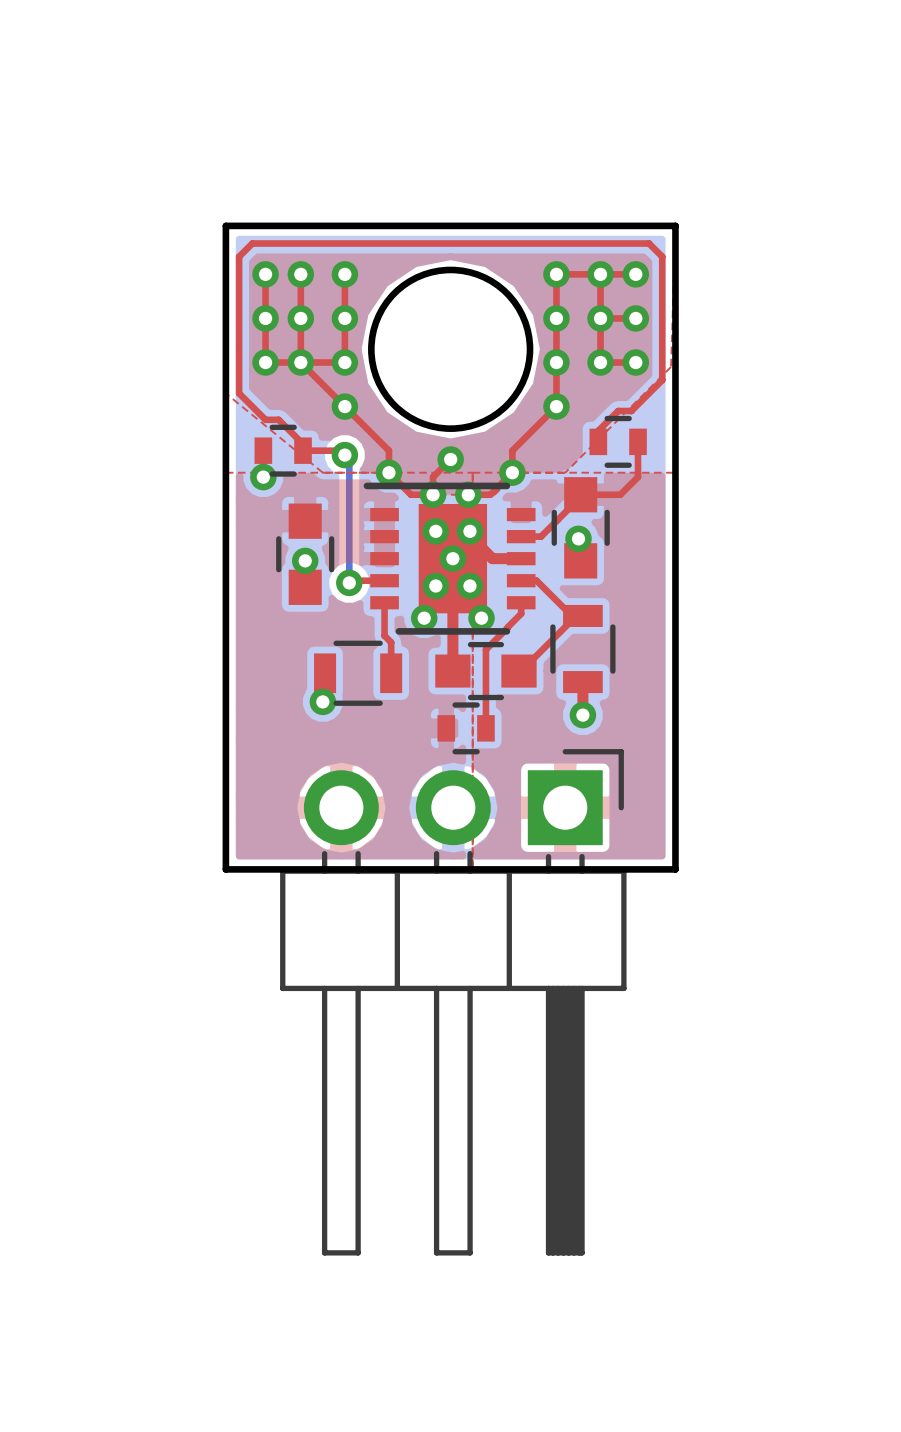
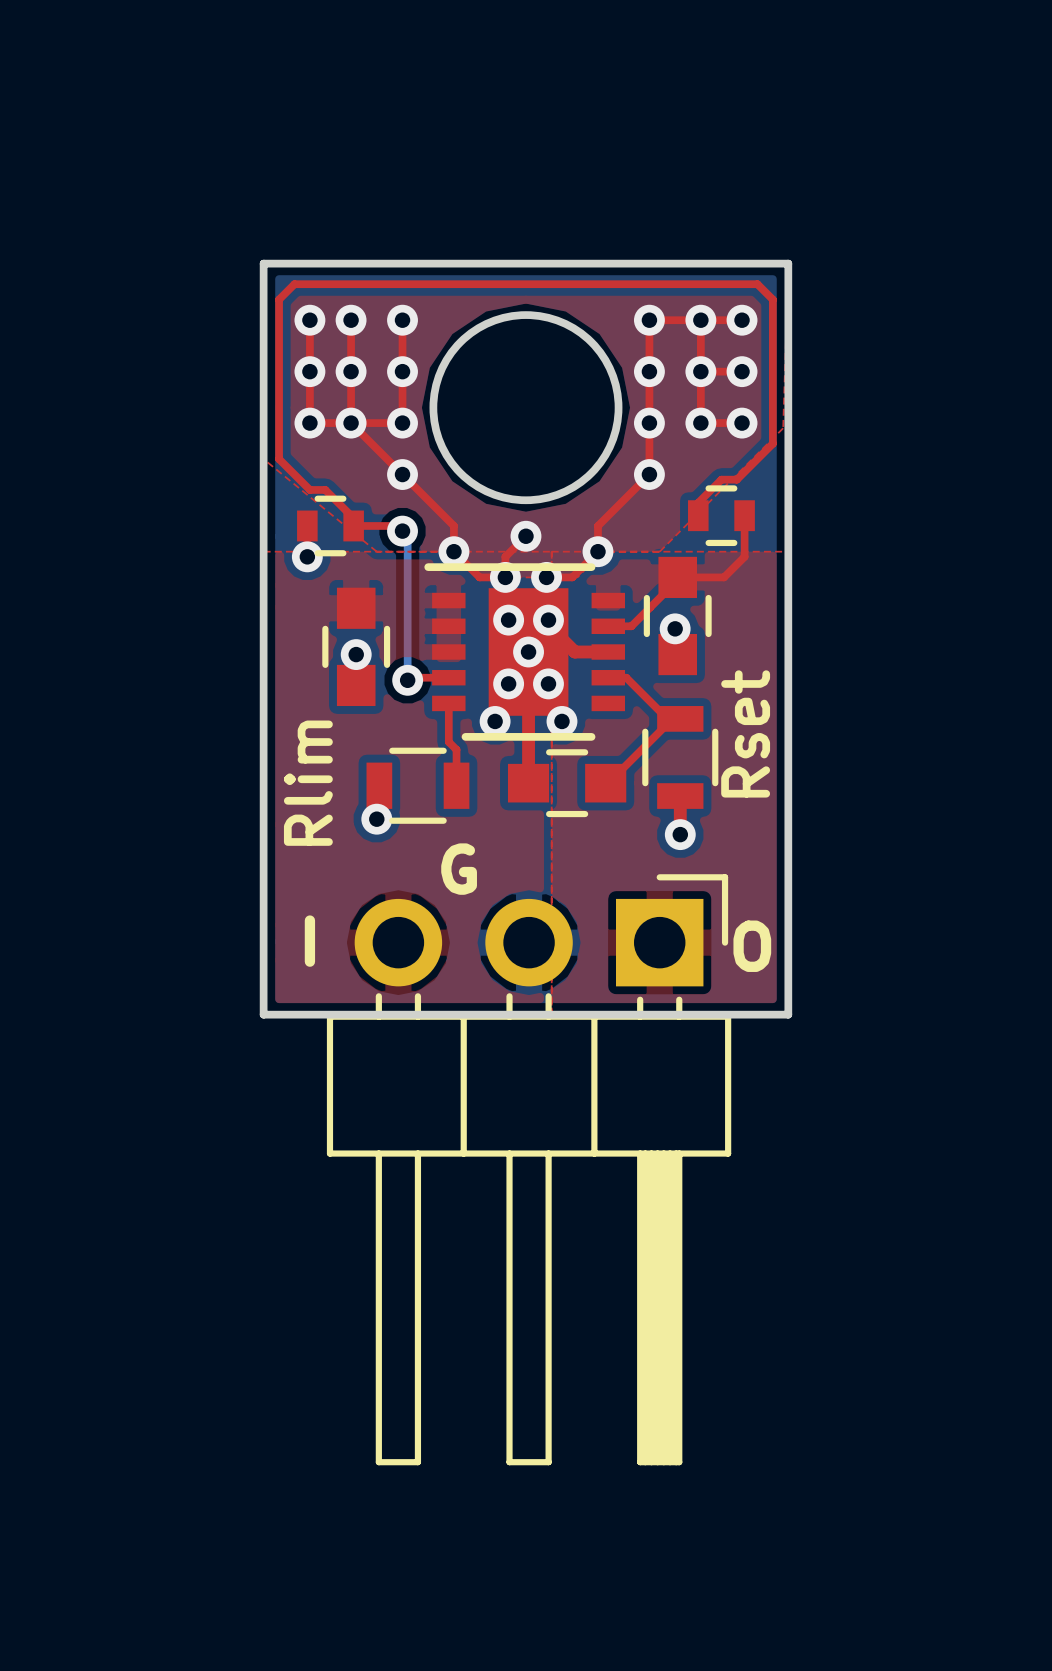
top track: (521, 602) (521, 613) (507, 626) -> none
top track: (507, 627) (485, 649) (485, 728) -> none
text: none -> Rset (745, 733)
text: none -> Rlim (308, 783)
part: (466, 728) -> none
text: none -> G (459, 869)
text: none -> I (309, 941)
text: none -> O (752, 946)

